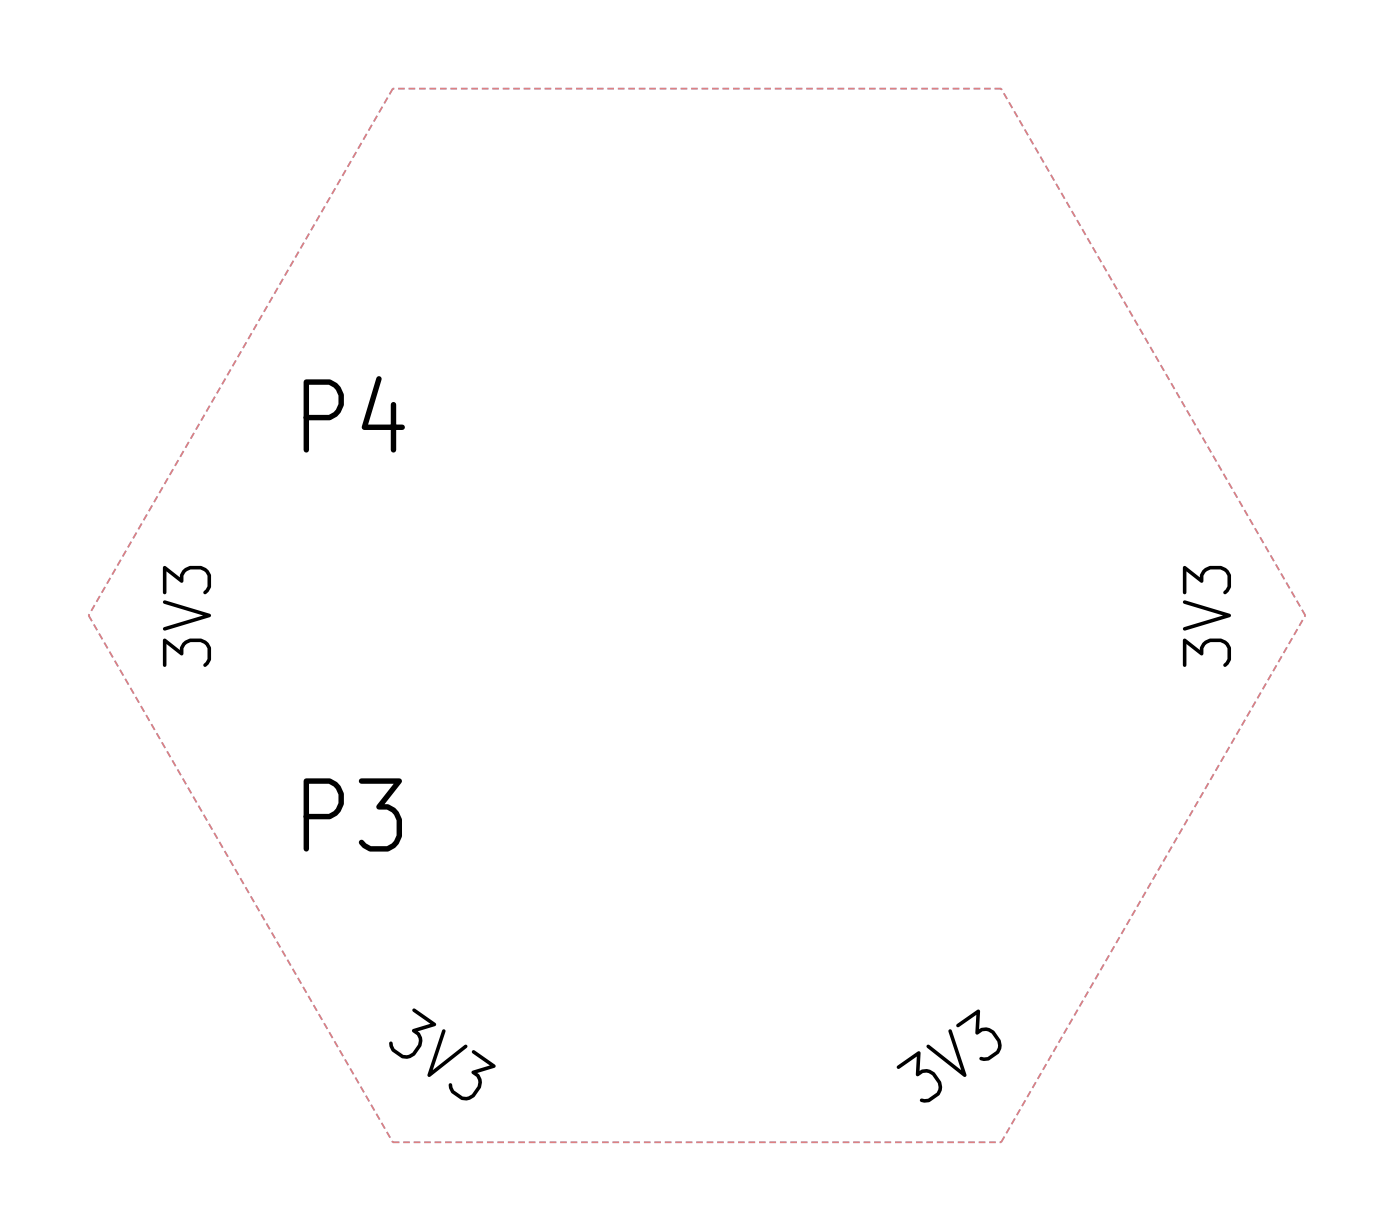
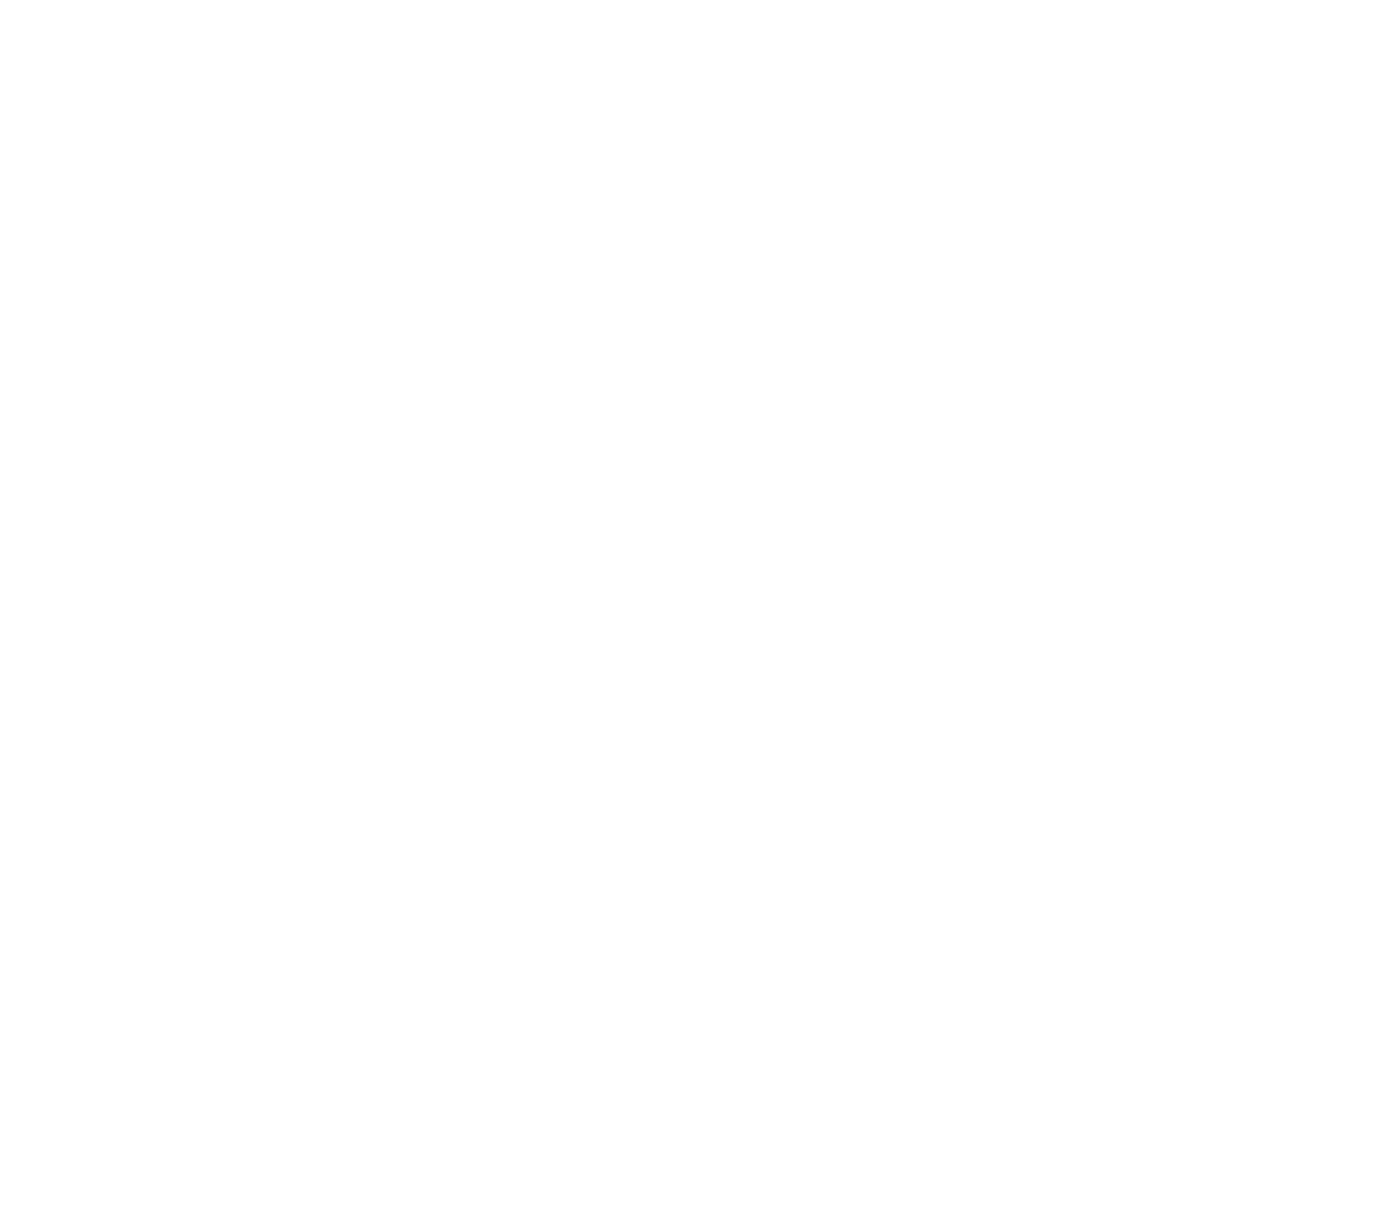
top zone outline: (392, 88) (1001, 88) (1305, 615) (1001, 1142) (392, 1142) (88, 615) (392, 88) -> none
text: P4 (354, 414) -> none
text: 3V3 (186, 616) -> none
text: 3V3 (1206, 616) -> none
text: P3 (352, 814) -> none
text: 3V3 (442, 1054) -> none
text: 3V3 (949, 1056) -> none

